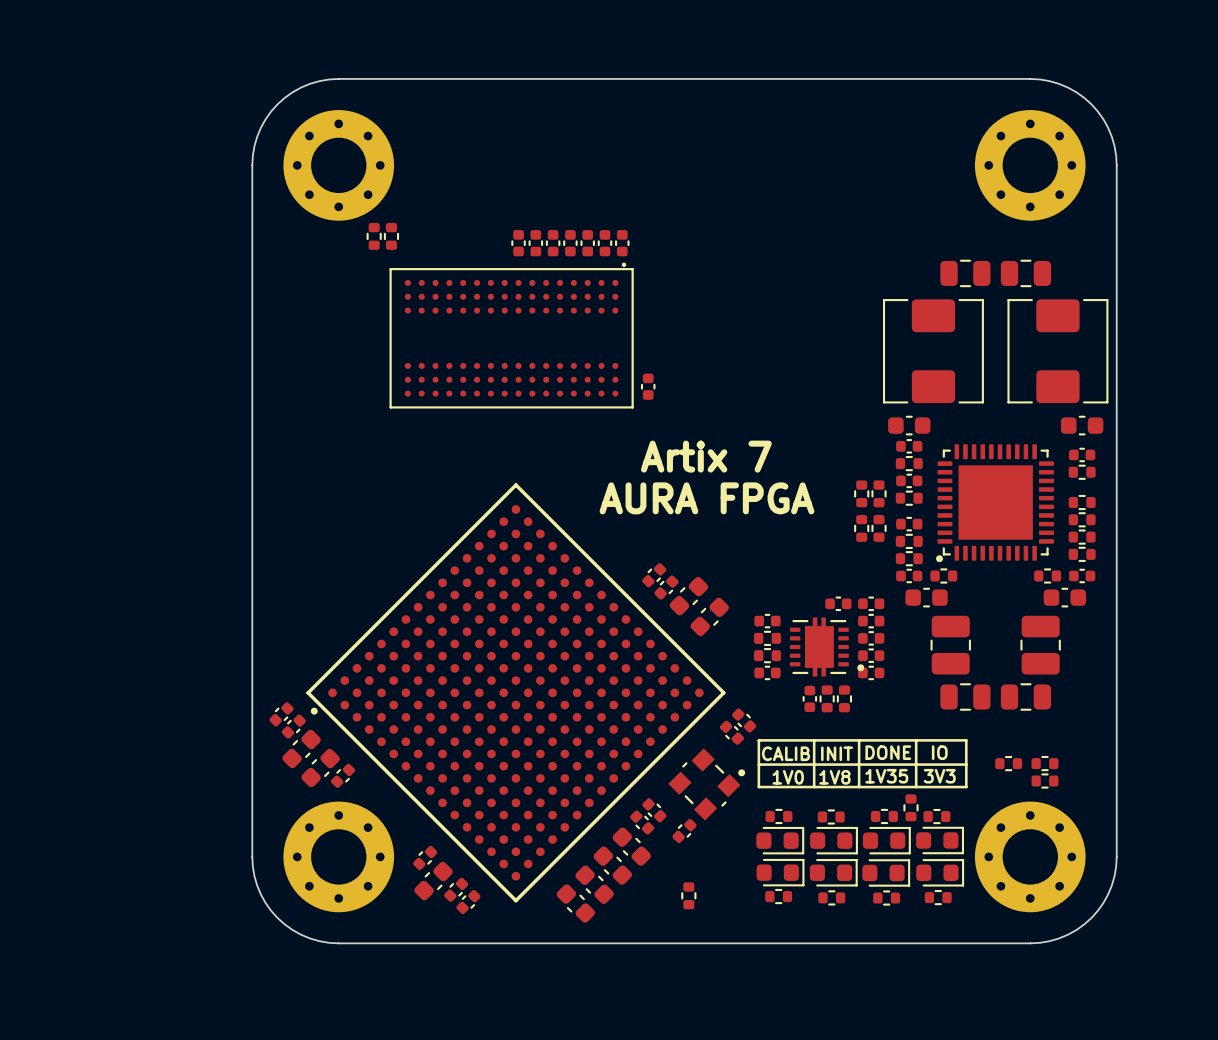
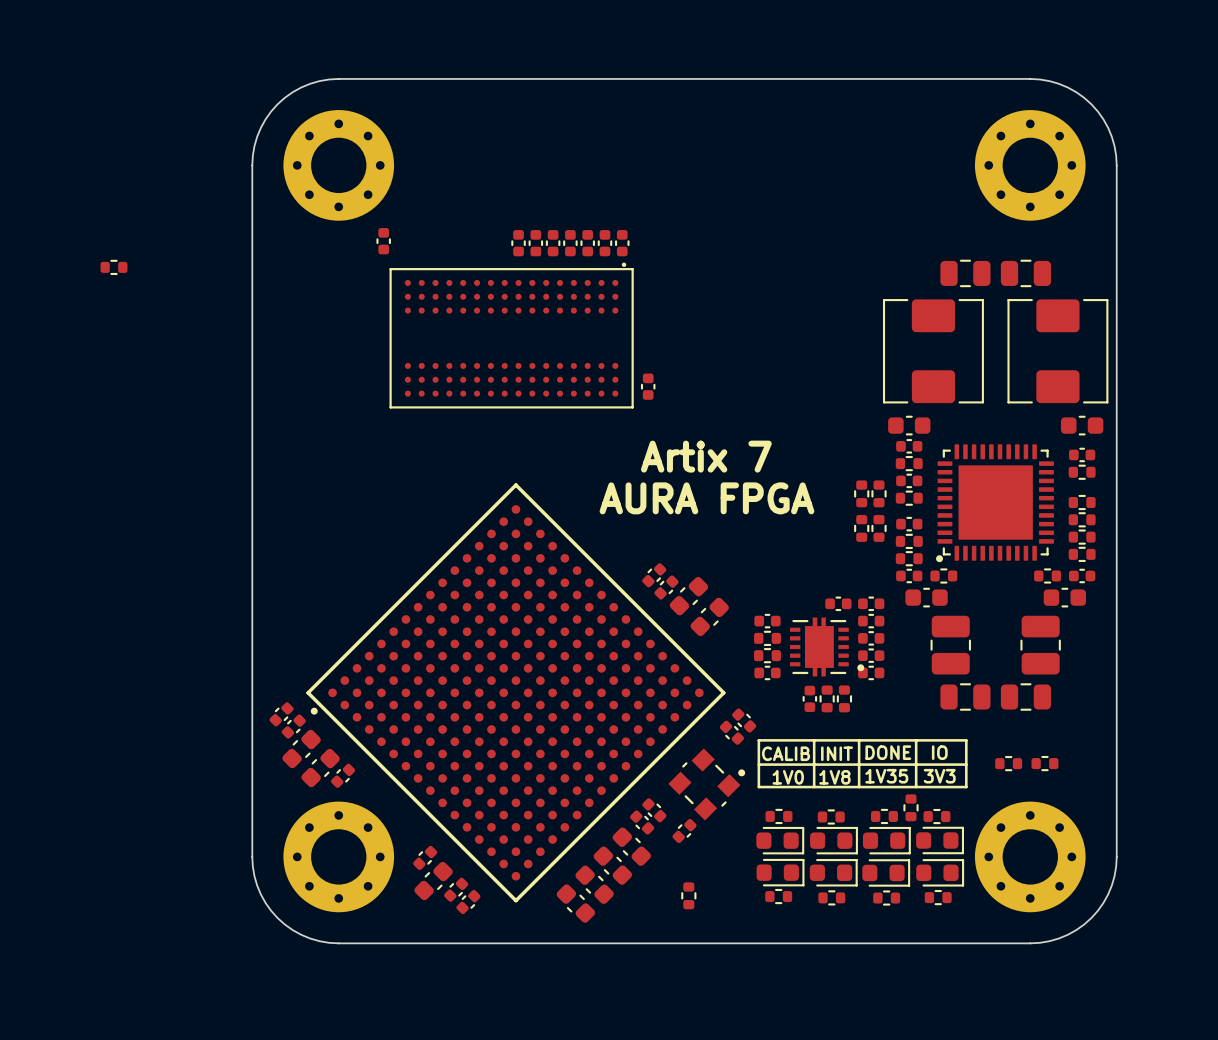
part: (374, 236) -> none
part: (391, 236) -> none
part: none -> (383, 241)
part: none -> (113, 267)
part: (1044, 781) -> none

